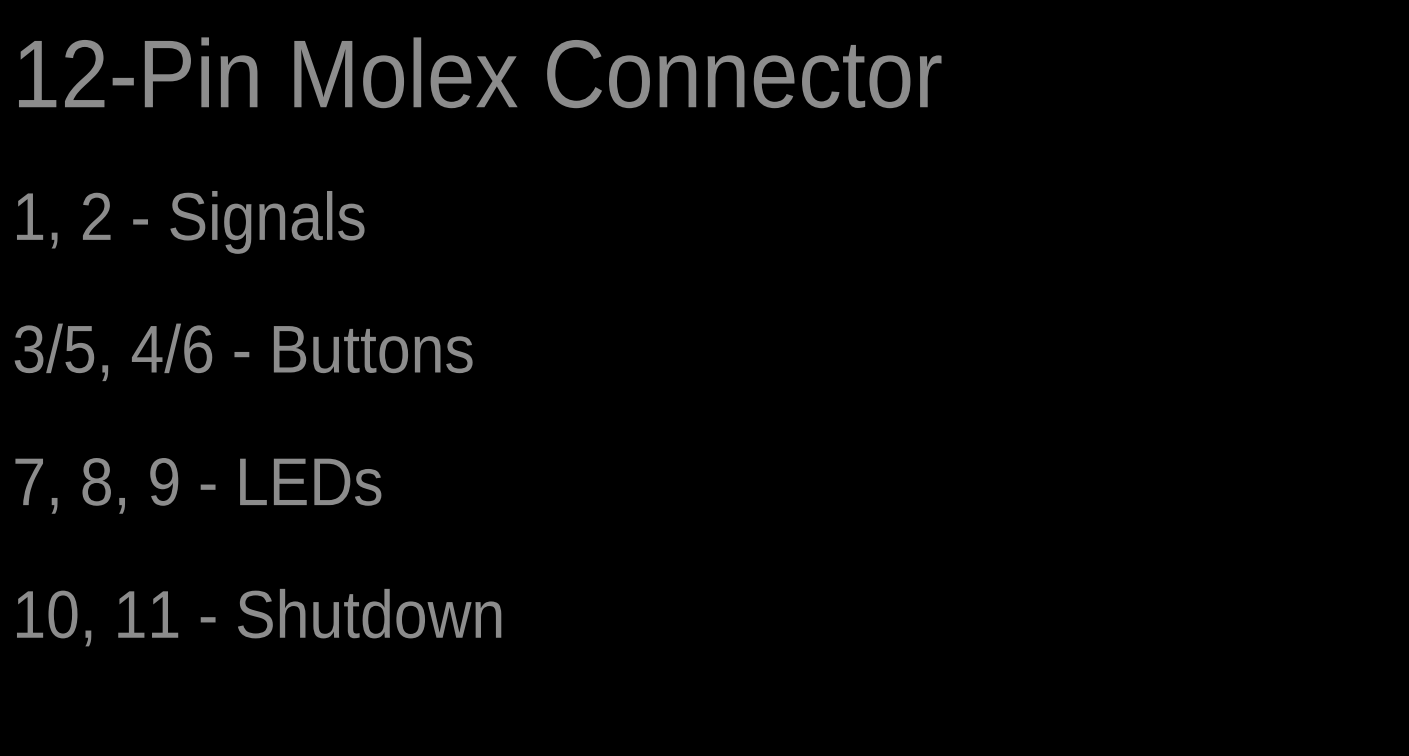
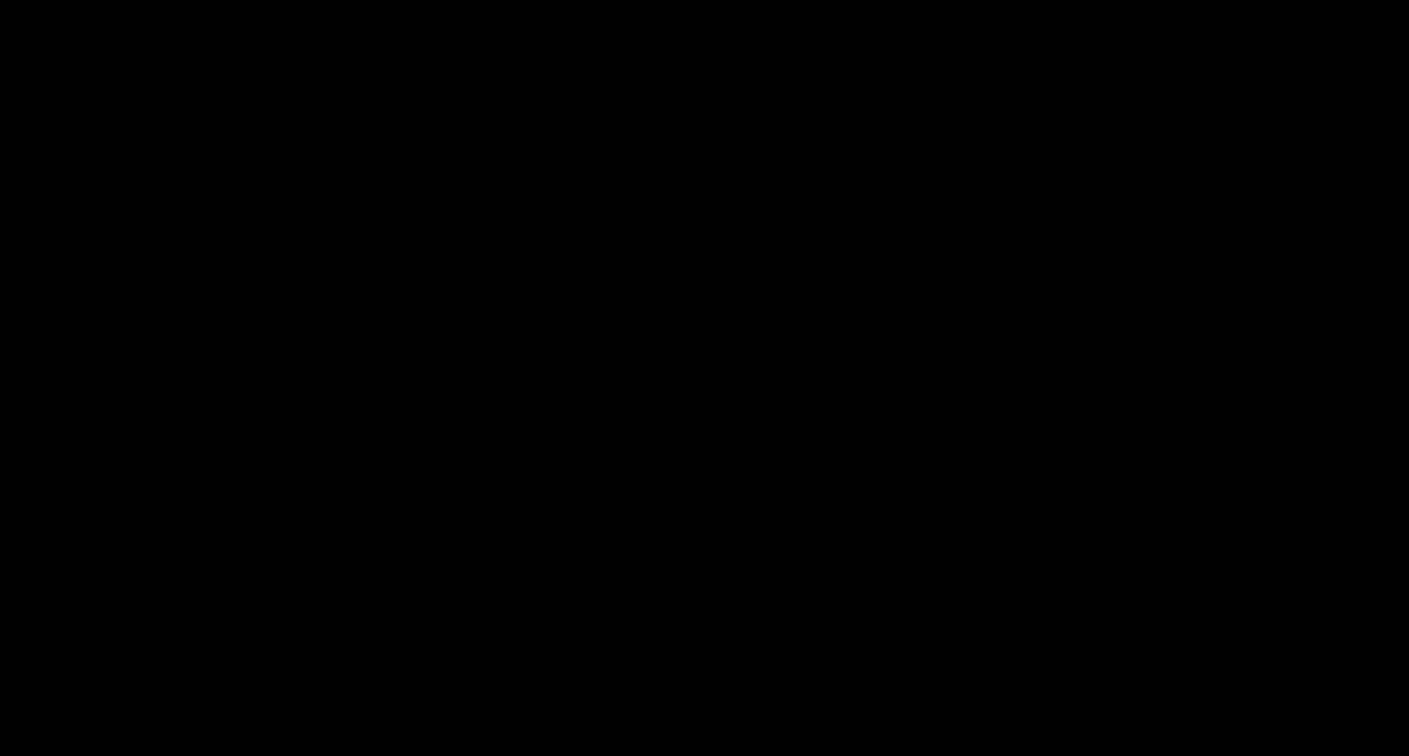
text: 12-Pin Molex Connector (480, 72) -> none
text: 1, 2 - Signals (190, 222) -> none
text: 3/5, 4/6 - Buttons (243, 352) -> none
text: 7, 8, 9 - LEDs (198, 485) -> none
text: 10, 11 - Shutdown (259, 617) -> none

